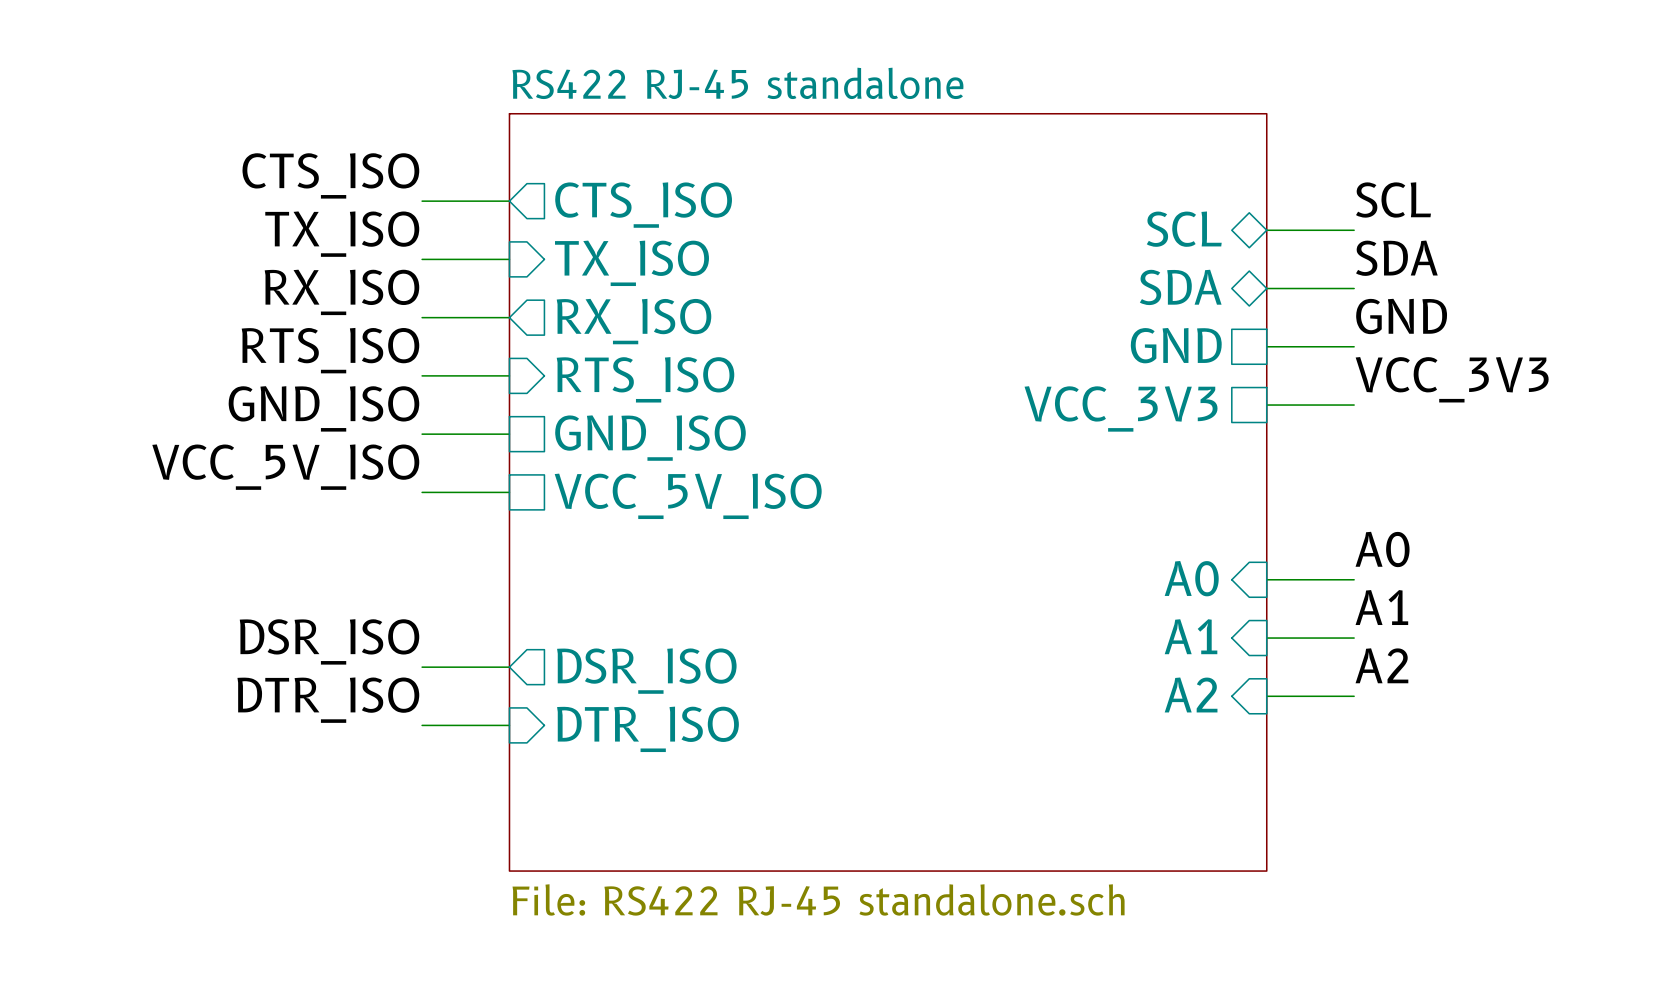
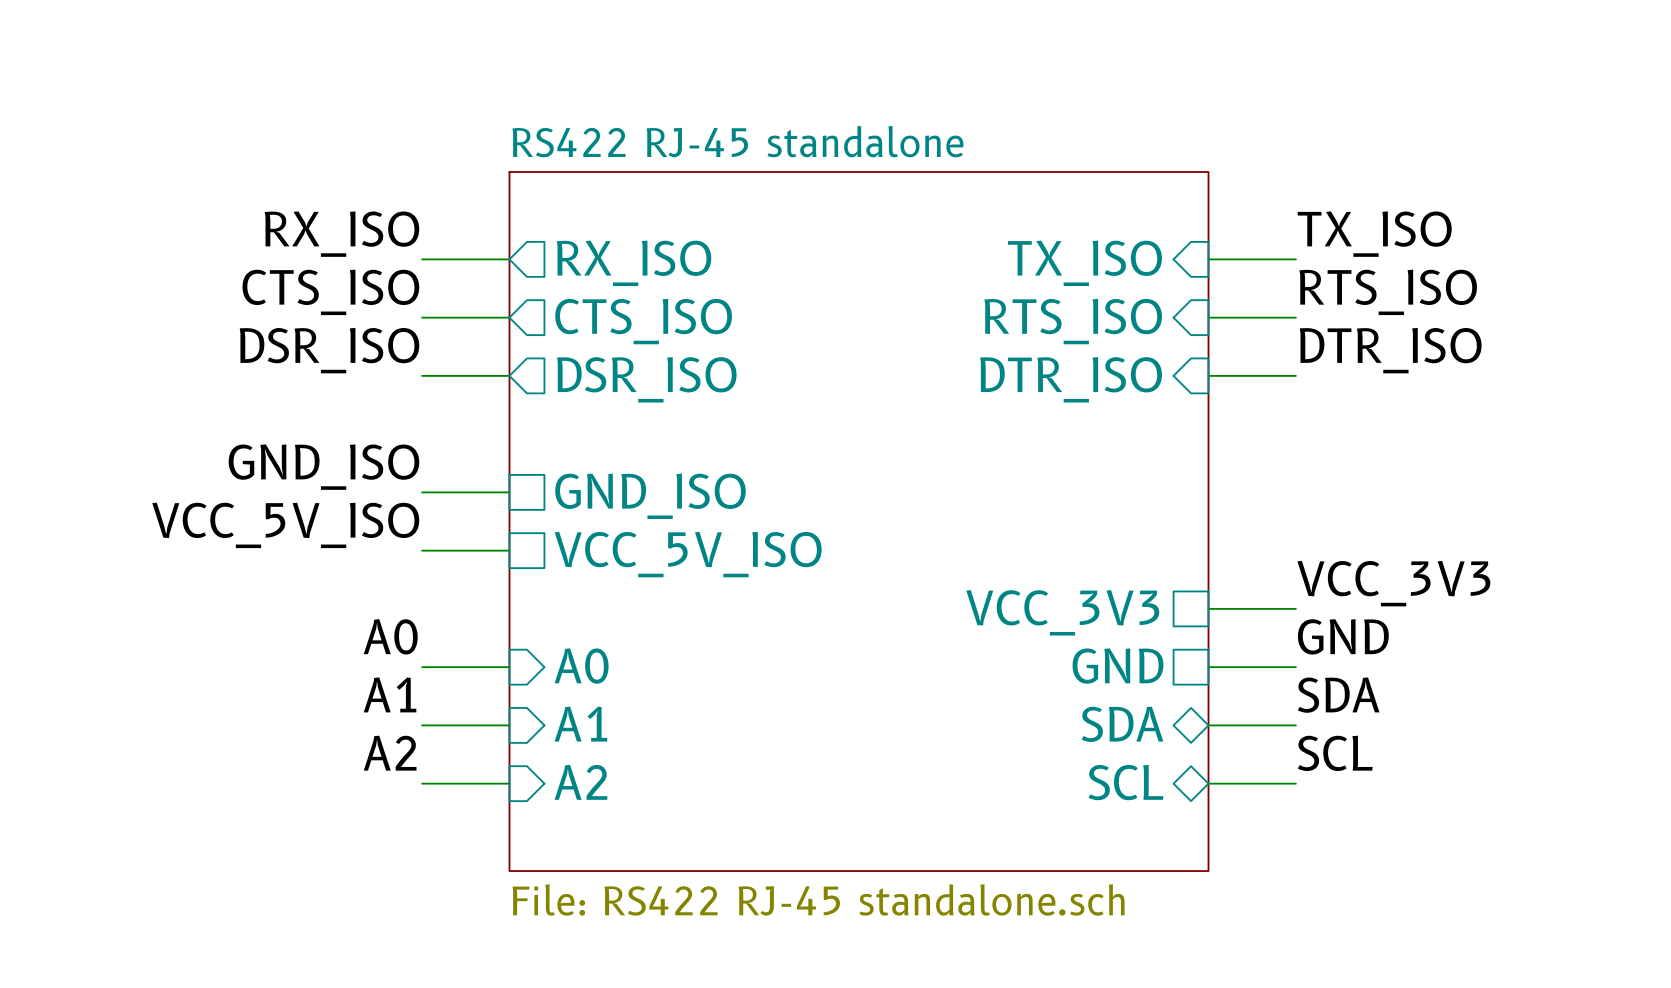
sheet RS422 RJ-45 standalone shape: [509, 113, 1267, 872] -> [509, 172, 1209, 872]
label: CTS_ISO (330, 175) -> none
label position: SCL (1393, 199) -> SCL (1335, 753)
wire: (422, 201) (509, 201) -> (422, 550) (509, 550)
sheet pin: CTS_ISO (643, 205) -> none
sheet pin position: SCL (1184, 229) -> SCL (1125, 782)
wire: (1266, 230) (1354, 230) -> (1208, 259) (1295, 259)
label: TX_ISO (342, 234) -> RX_ISO (341, 234)
label: none -> TX_ISO (1374, 234)
label position: SDA (1396, 258) -> SDA (1338, 695)
sheet pin shape: input (631, 263) -> output (634, 263)
sheet pin: TX_ISO (631, 263) -> RX_ISO (634, 263)
sheet pin: none -> TX_ISO (1084, 263)
sheet pin position: SDA (1180, 287) -> SDA (1122, 724)
wire: (1266, 288) (1354, 288) -> (1208, 317) (1295, 317)
label: RX_ISO (341, 292) -> CTS_ISO (330, 292)
label: none -> RTS_ISO (1388, 292)
label position: GND (1401, 316) -> GND (1343, 636)
sheet pin: RX_ISO (634, 321) -> CTS_ISO (643, 321)
sheet pin: none -> RTS_ISO (1073, 321)
sheet pin position: GND (1176, 345) -> GND (1118, 666)
wire: (1266, 346) (1354, 346) -> (1208, 375) (1295, 375)
label: RTS_ISO (330, 350) -> DSR_ISO (329, 350)
label: none -> DTR_ISO (1390, 350)
sheet pin shape: input (645, 379) -> output (646, 379)
sheet pin: RTS_ISO (645, 379) -> DSR_ISO (646, 379)
sheet pin: none -> DTR_ISO (1071, 379)
label position: VCC_3V3 (1452, 379) -> VCC_3V3 (1393, 583)
wire: (1266, 405) (1354, 405) -> (1208, 783) (1295, 783)
label: GND_ISO (323, 408) -> none
sheet pin position: VCC_3V3 (1121, 408) -> VCC_3V3 (1062, 612)
wire: (422, 434) (509, 434) -> (422, 783) (509, 783)
sheet pin: GND_ISO (650, 438) -> none
label: VCC_5V_ISO (285, 467) -> GND_ISO (323, 467)
sheet pin: VCC_5V_ISO (688, 496) -> GND_ISO (650, 496)
label: none -> VCC_5V_ISO (285, 525)
label: A0 (1382, 549) -> none
sheet pin: none -> VCC_5V_ISO (688, 554)
sheet pin: A0 (1191, 578) -> none
wire: (1266, 579) (1354, 579) -> (1208, 608) (1295, 608)
label: A1 (1381, 607) -> none
sheet pin: A1 (1191, 636) -> none
wire: (1266, 638) (1354, 638) -> (1208, 667) (1295, 667)
label: DSR_ISO (329, 641) -> A0 (390, 636)
label: A2 (1381, 665) -> none
sheet pin shape: output (646, 671) -> input (581, 666)
sheet pin: DSR_ISO (646, 671) -> A0 (581, 666)
sheet pin: A2 (1191, 694) -> none
wire: (1266, 696) (1354, 696) -> (1208, 725) (1295, 725)
label: DTR_ISO (328, 700) -> A1 (390, 694)
sheet pin: DTR_ISO (647, 729) -> A1 (580, 724)
label: none -> A2 (390, 753)
sheet pin: none -> A2 (580, 782)

